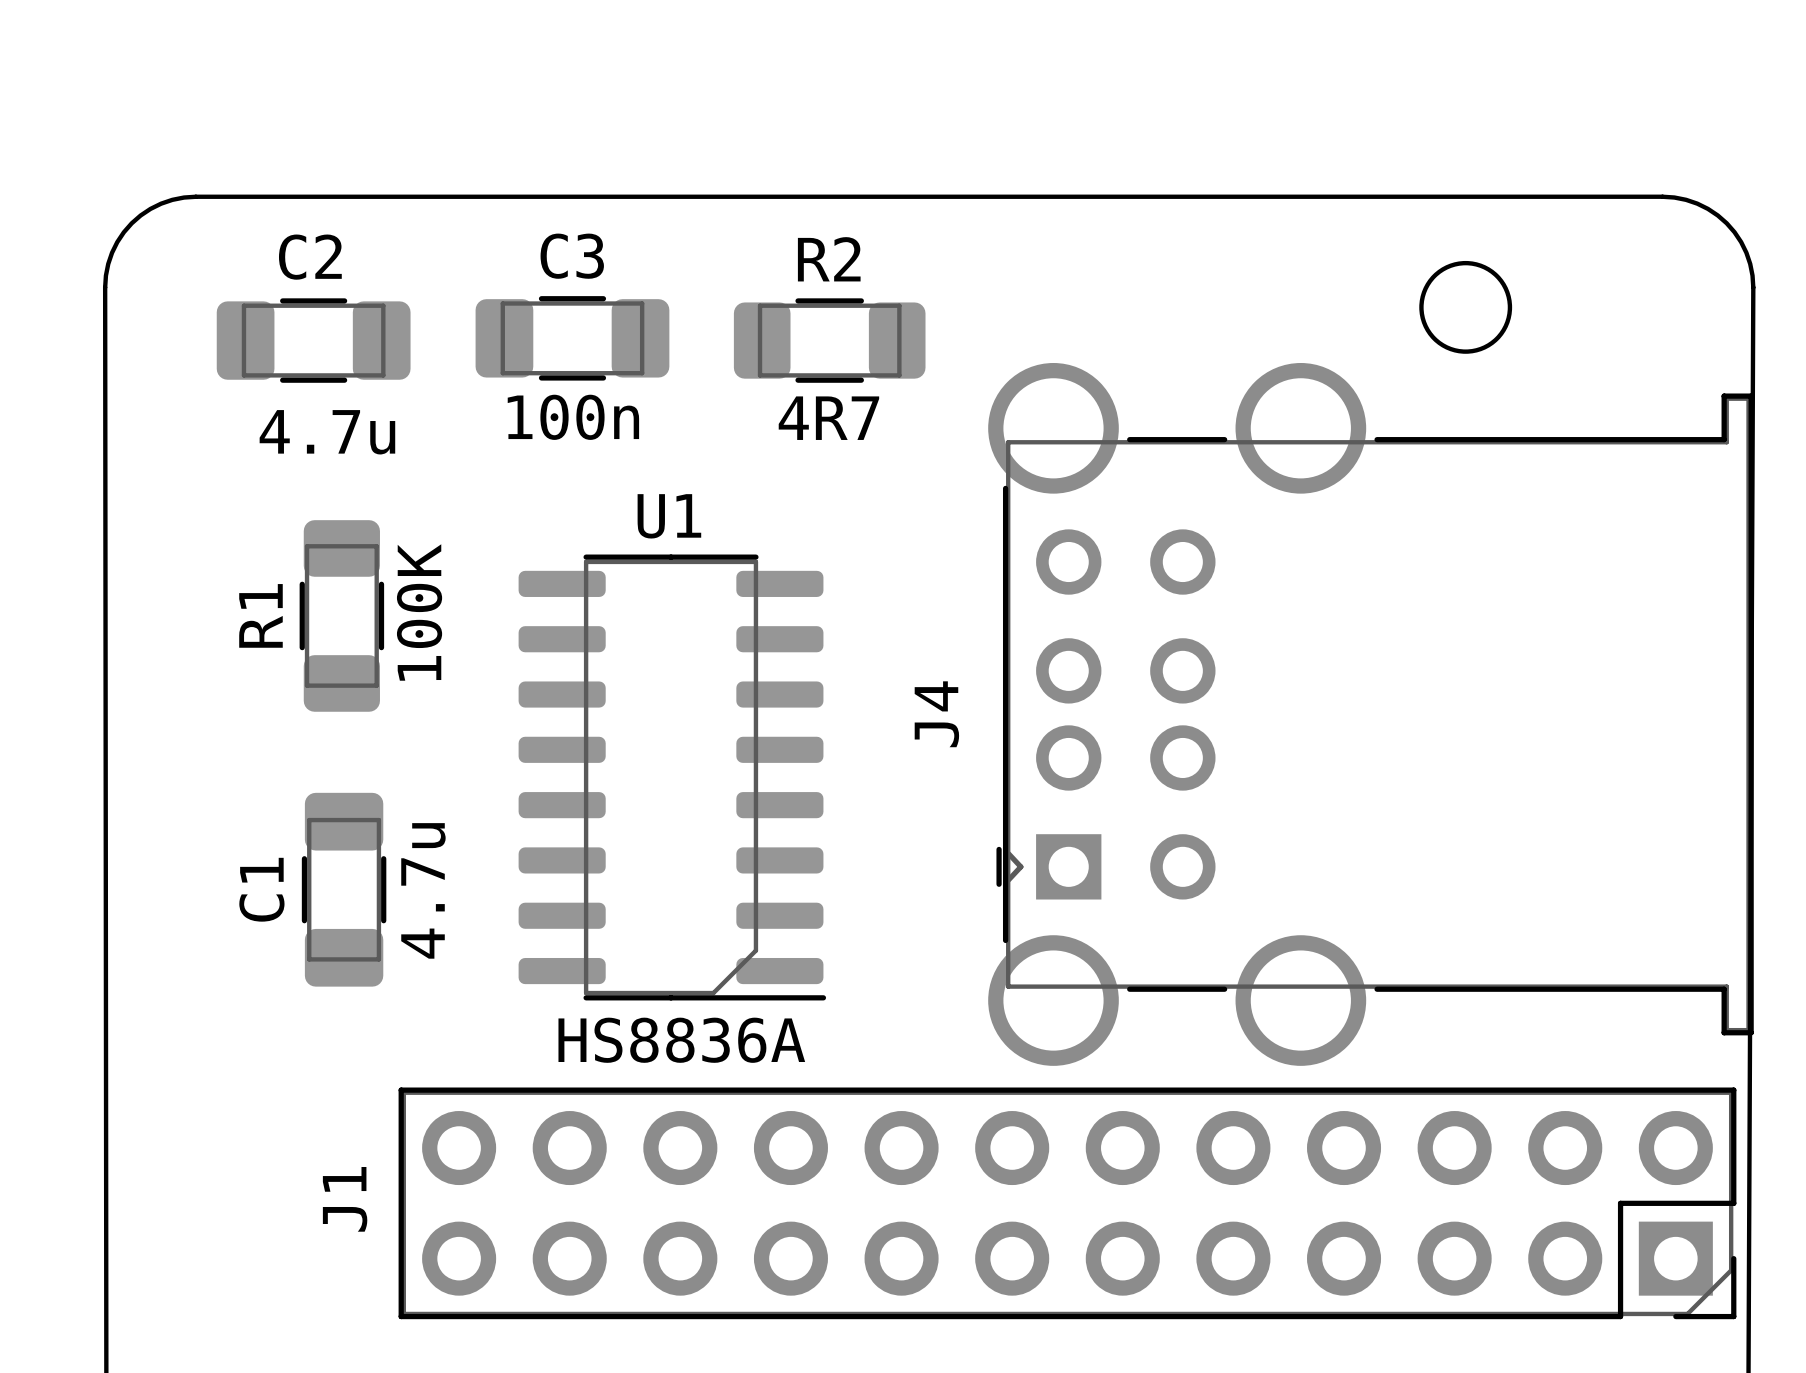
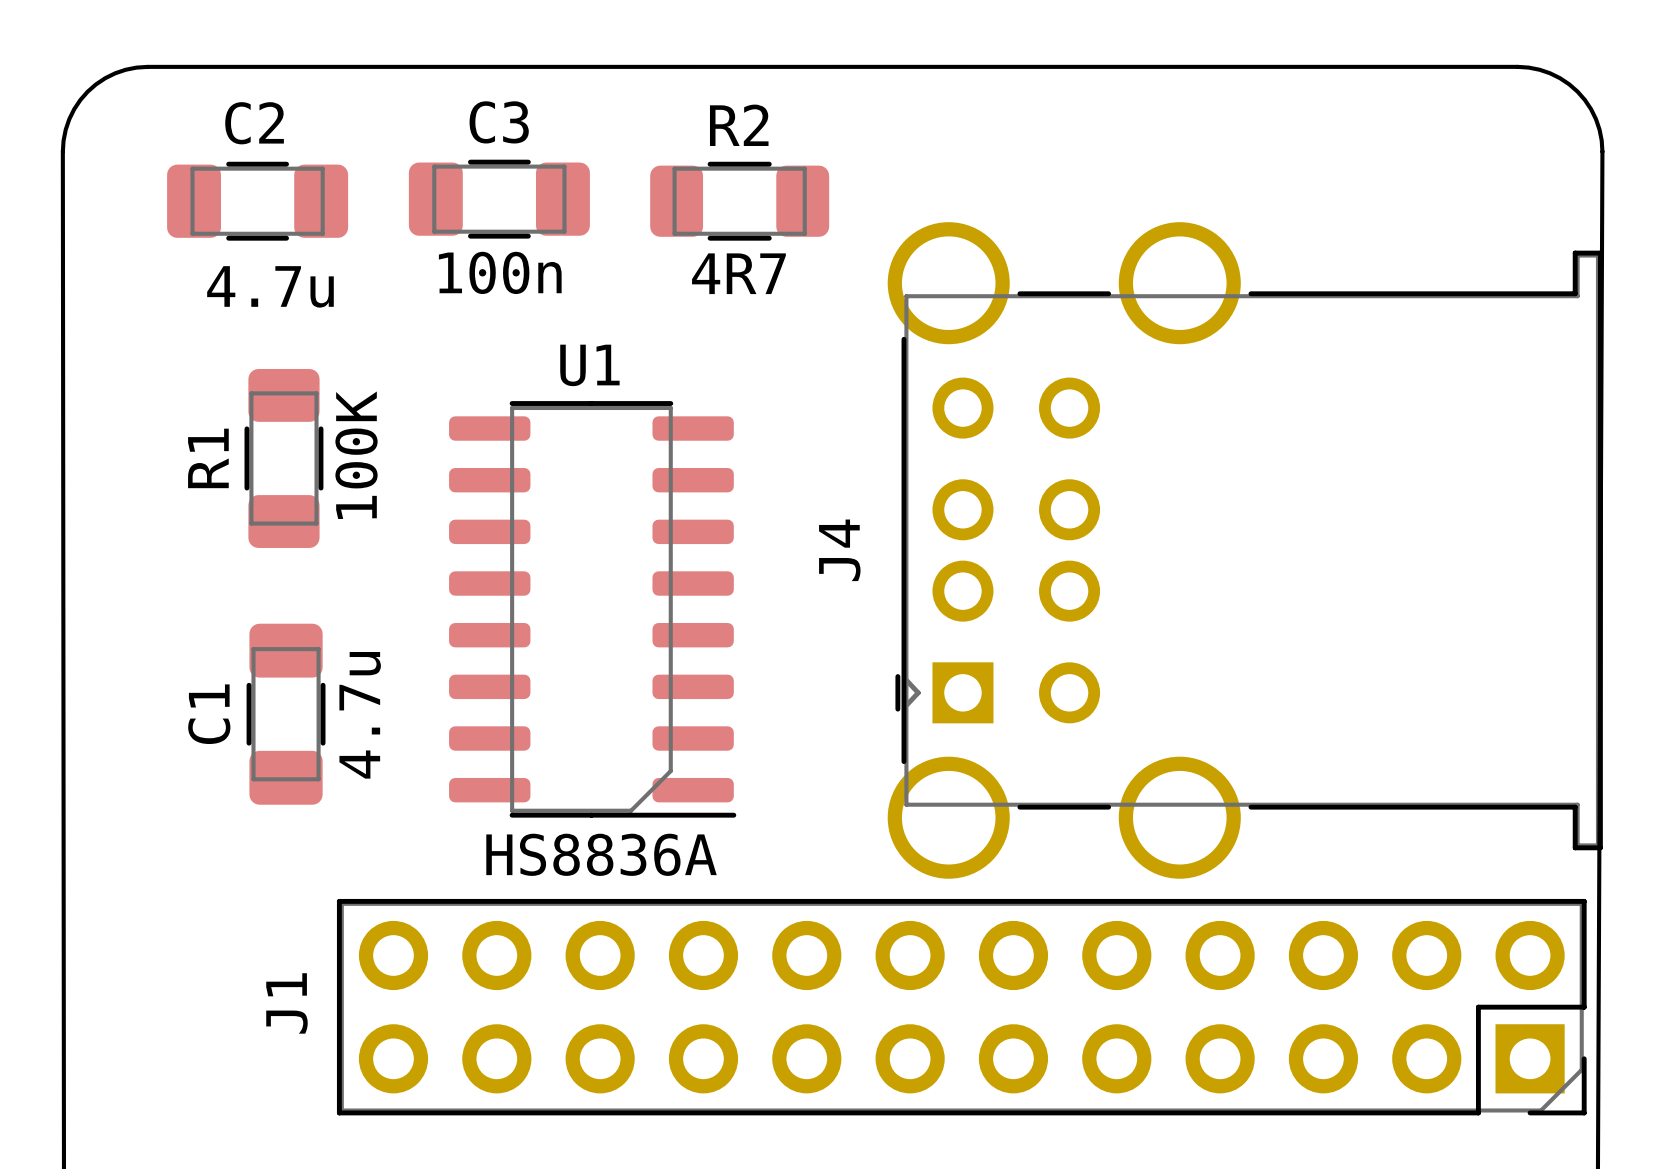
round board edge: [1419, 260, 1513, 354] -> none

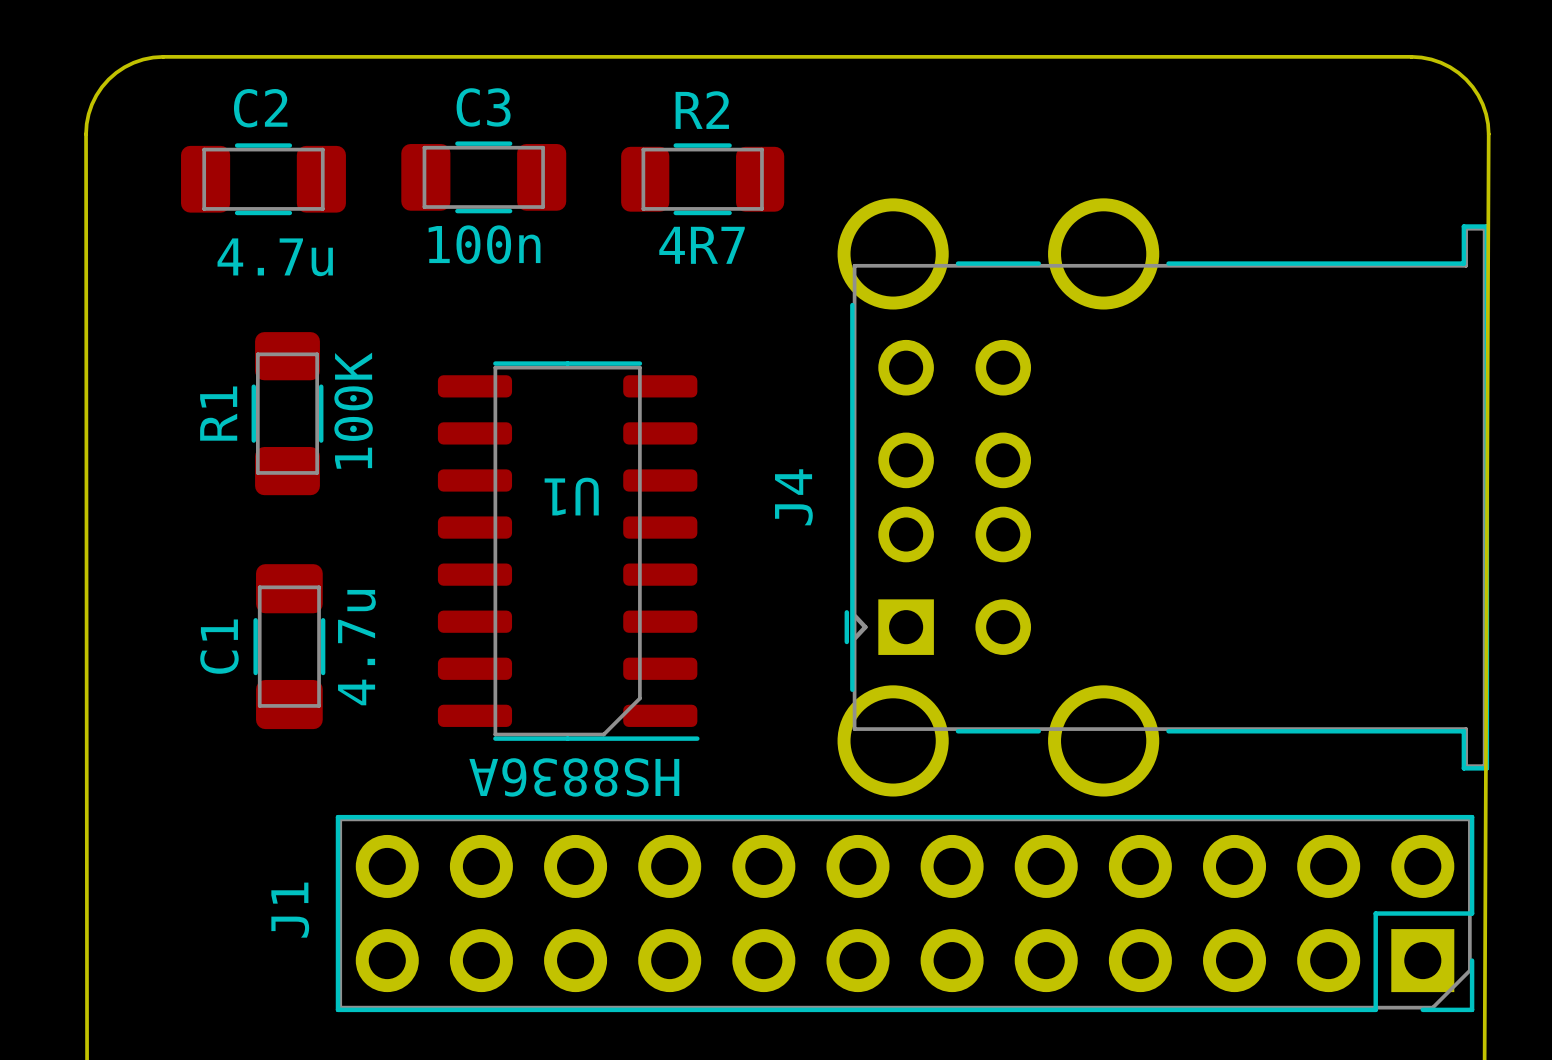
U1 name rotation: 0° (589, 365) -> 180° (571, 496)
U1 name position: U1 (589, 365) -> U1 (571, 496)
U1 value rotation: 0° (601, 854) -> 180° (574, 777)

